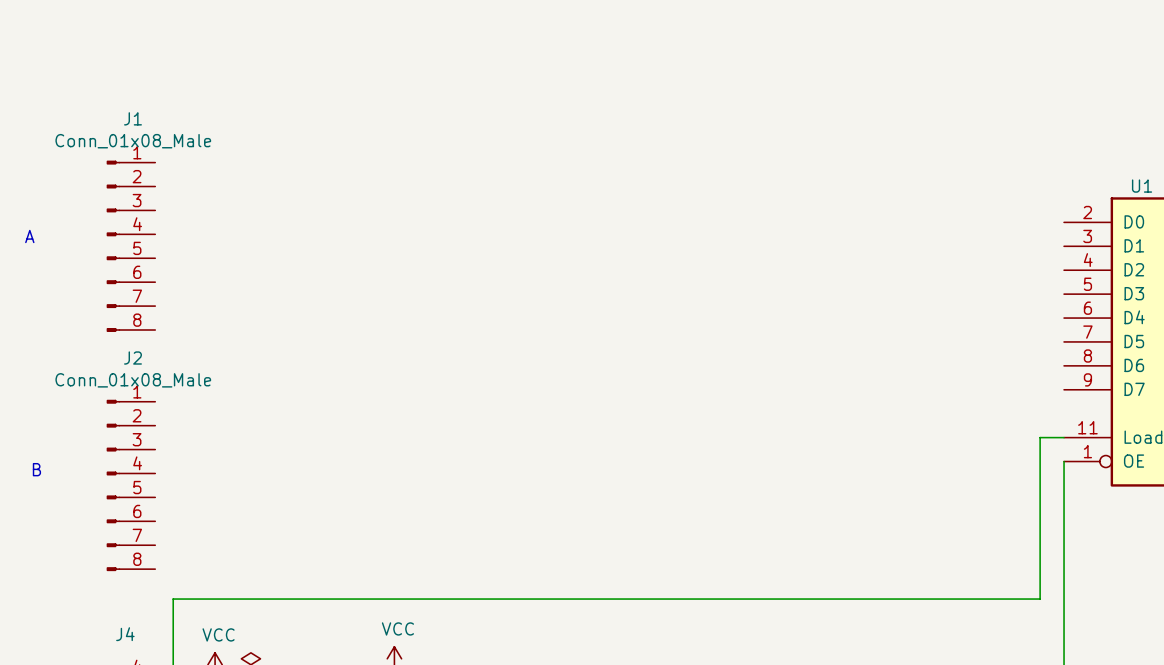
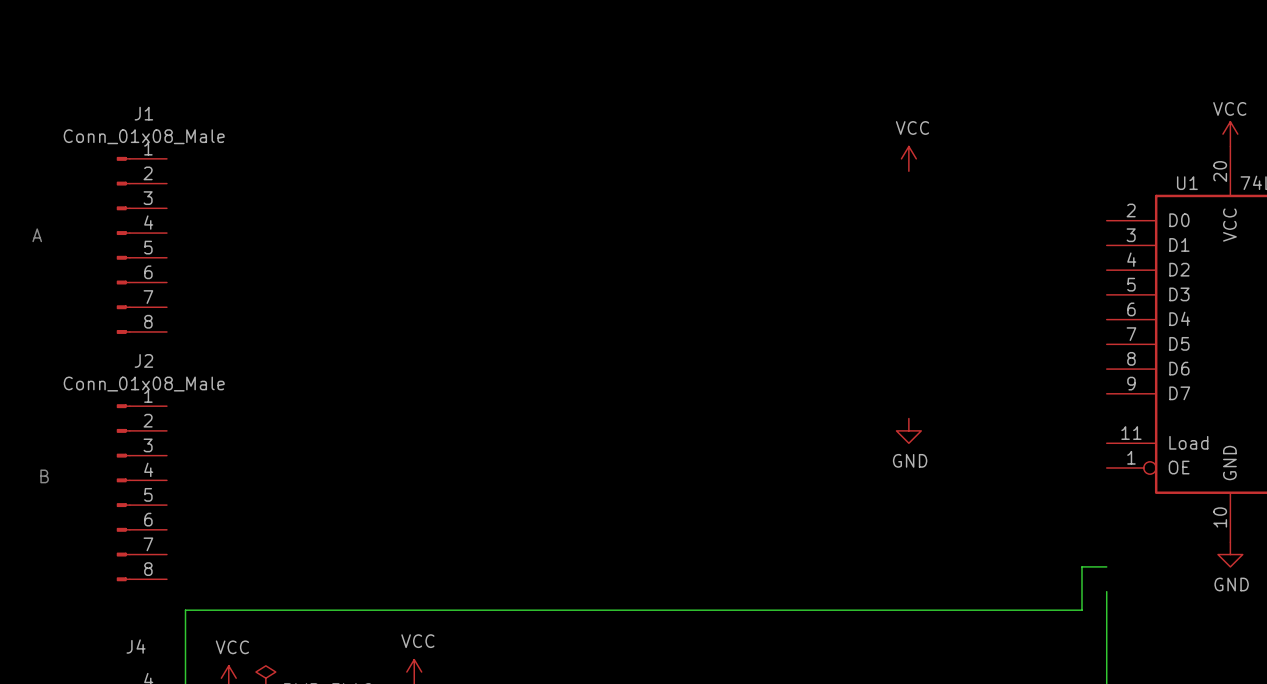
power symbol: none -> VCC (908, 158)
power symbol: none -> GND (908, 430)
wire: (1064, 437) (1040, 437) (1040, 557) -> (1106, 566) (1081, 566)
wire: (1064, 461) (1064, 581) -> none

